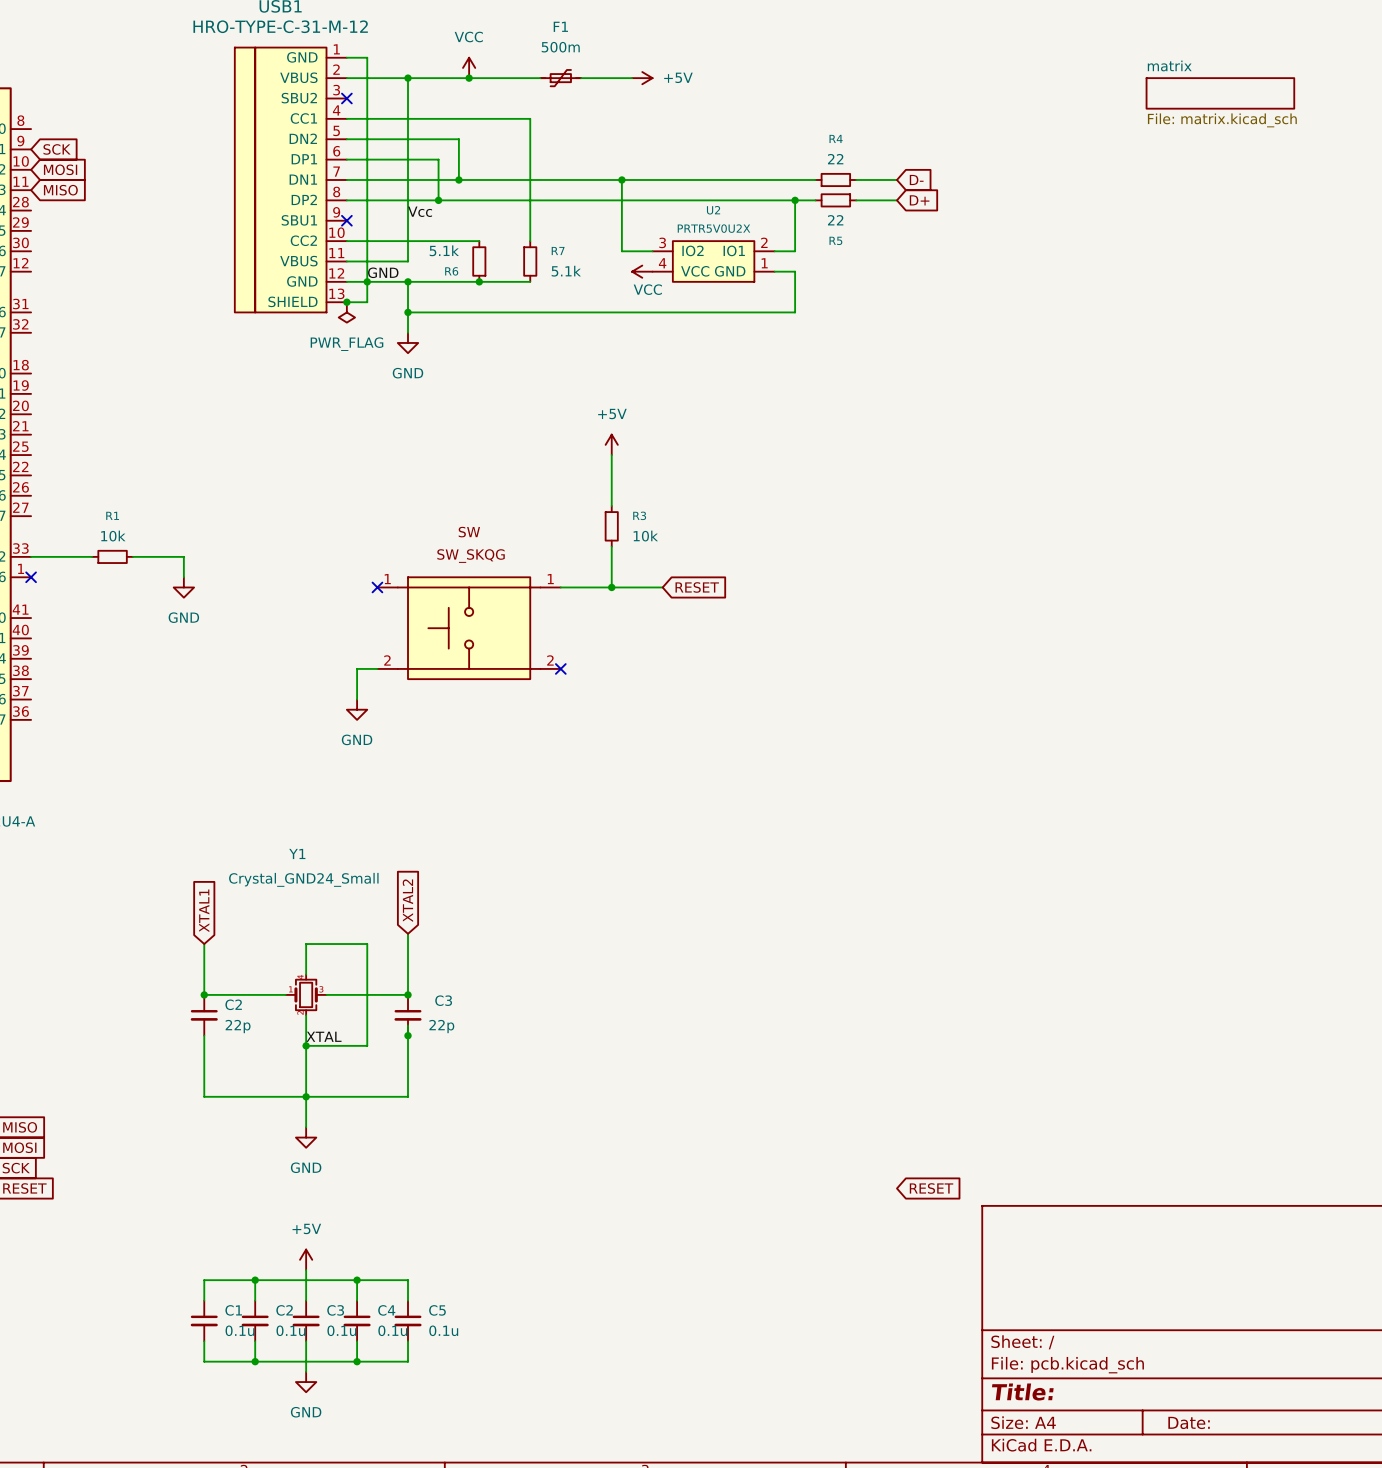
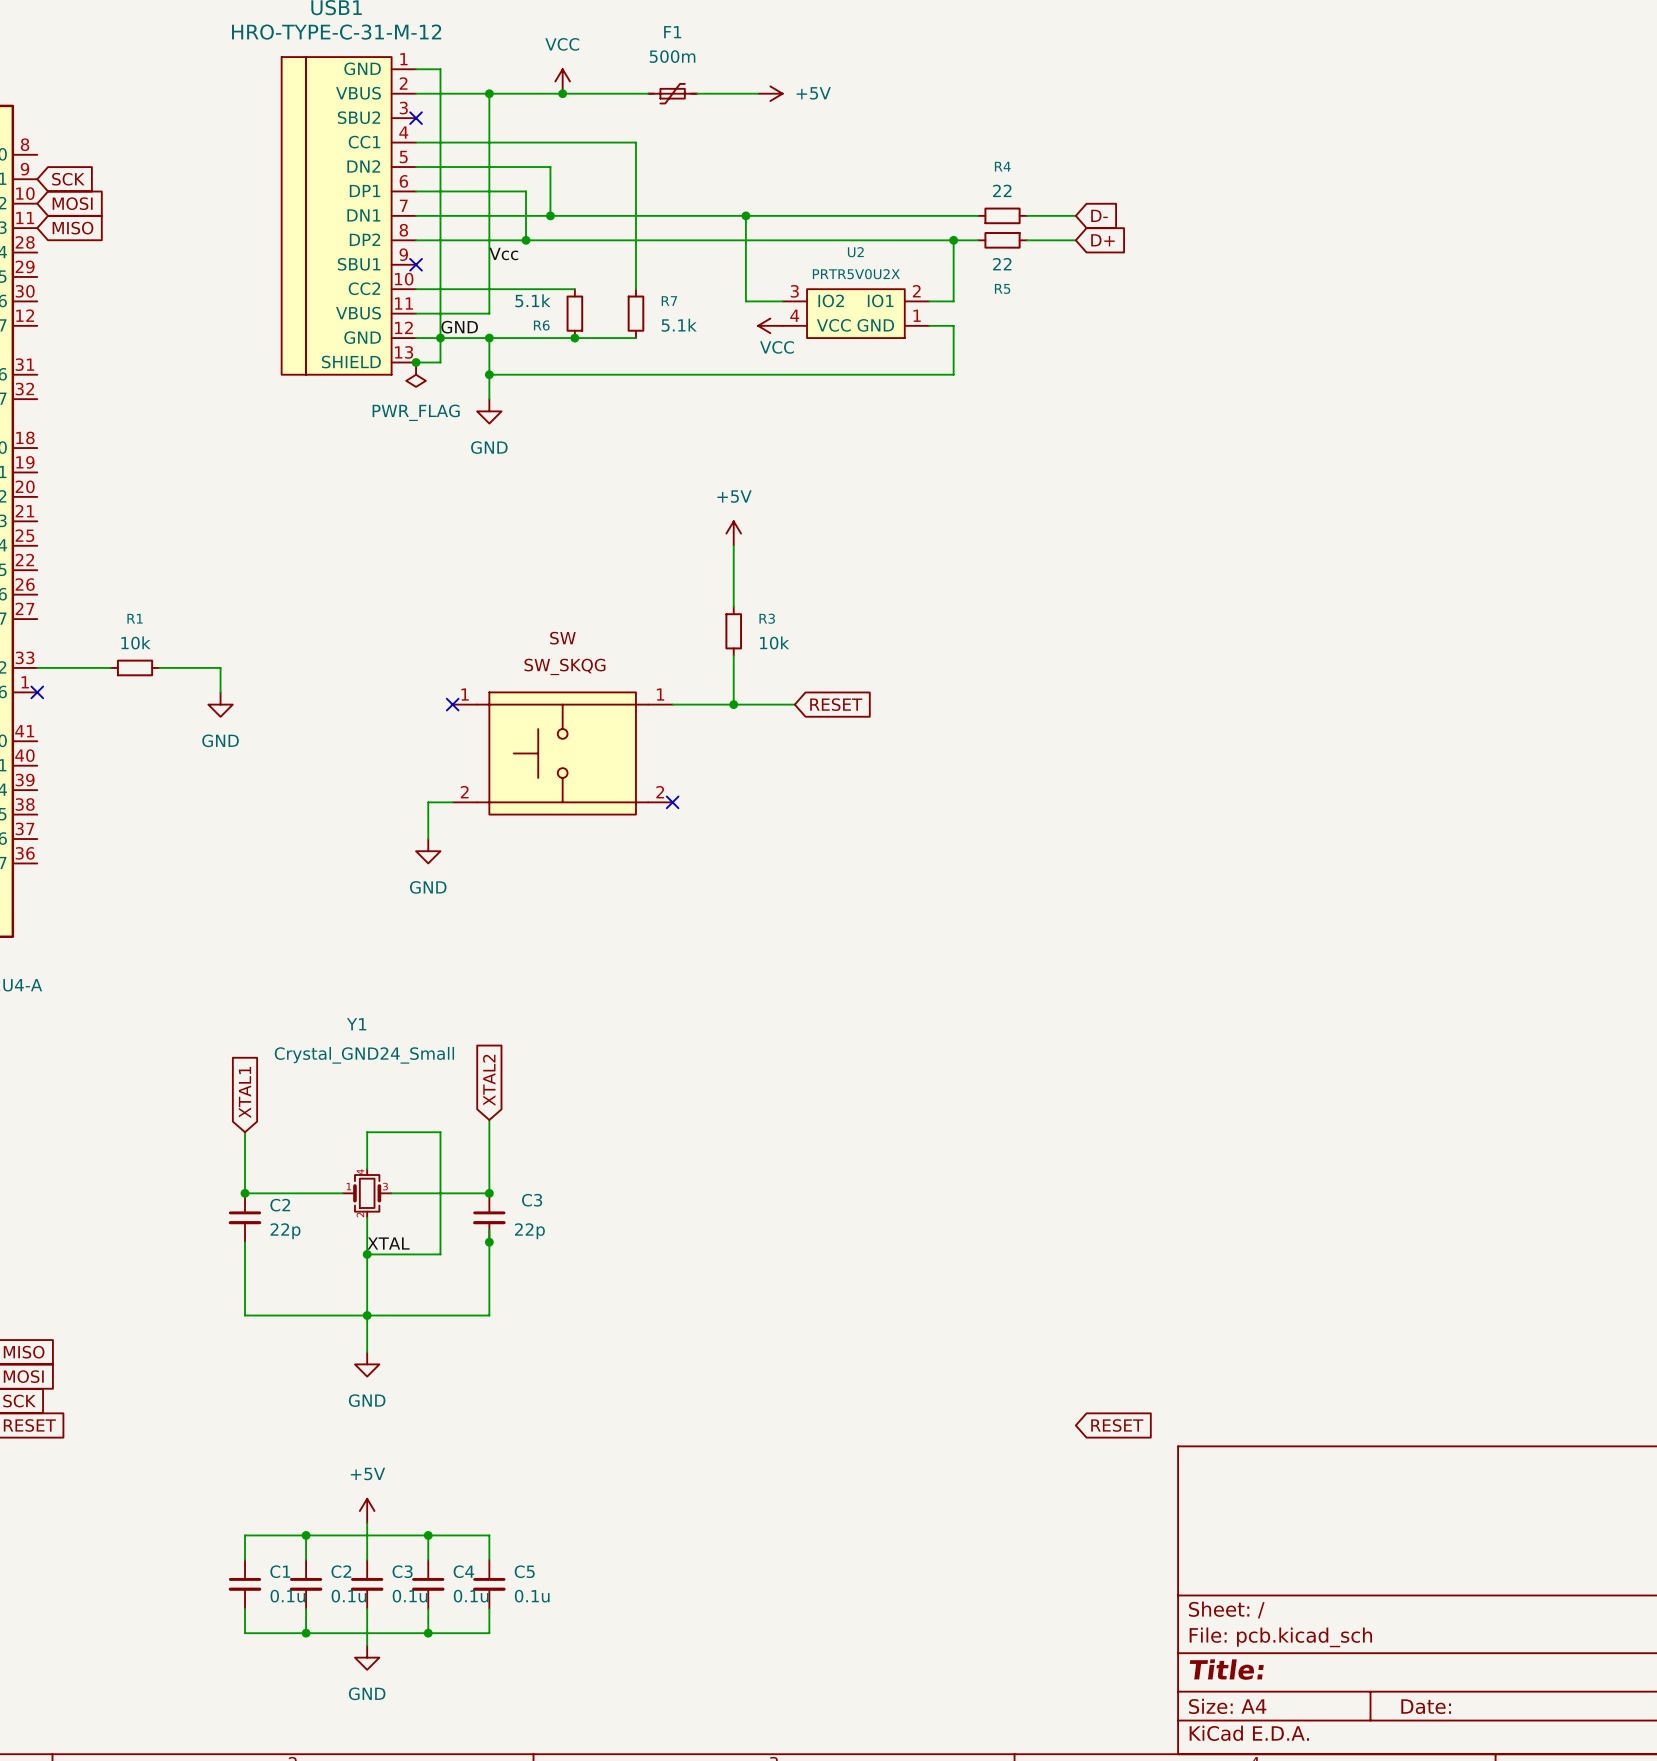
sheet matrix: File: matrix.kicad_sch (1220, 93) -> none

